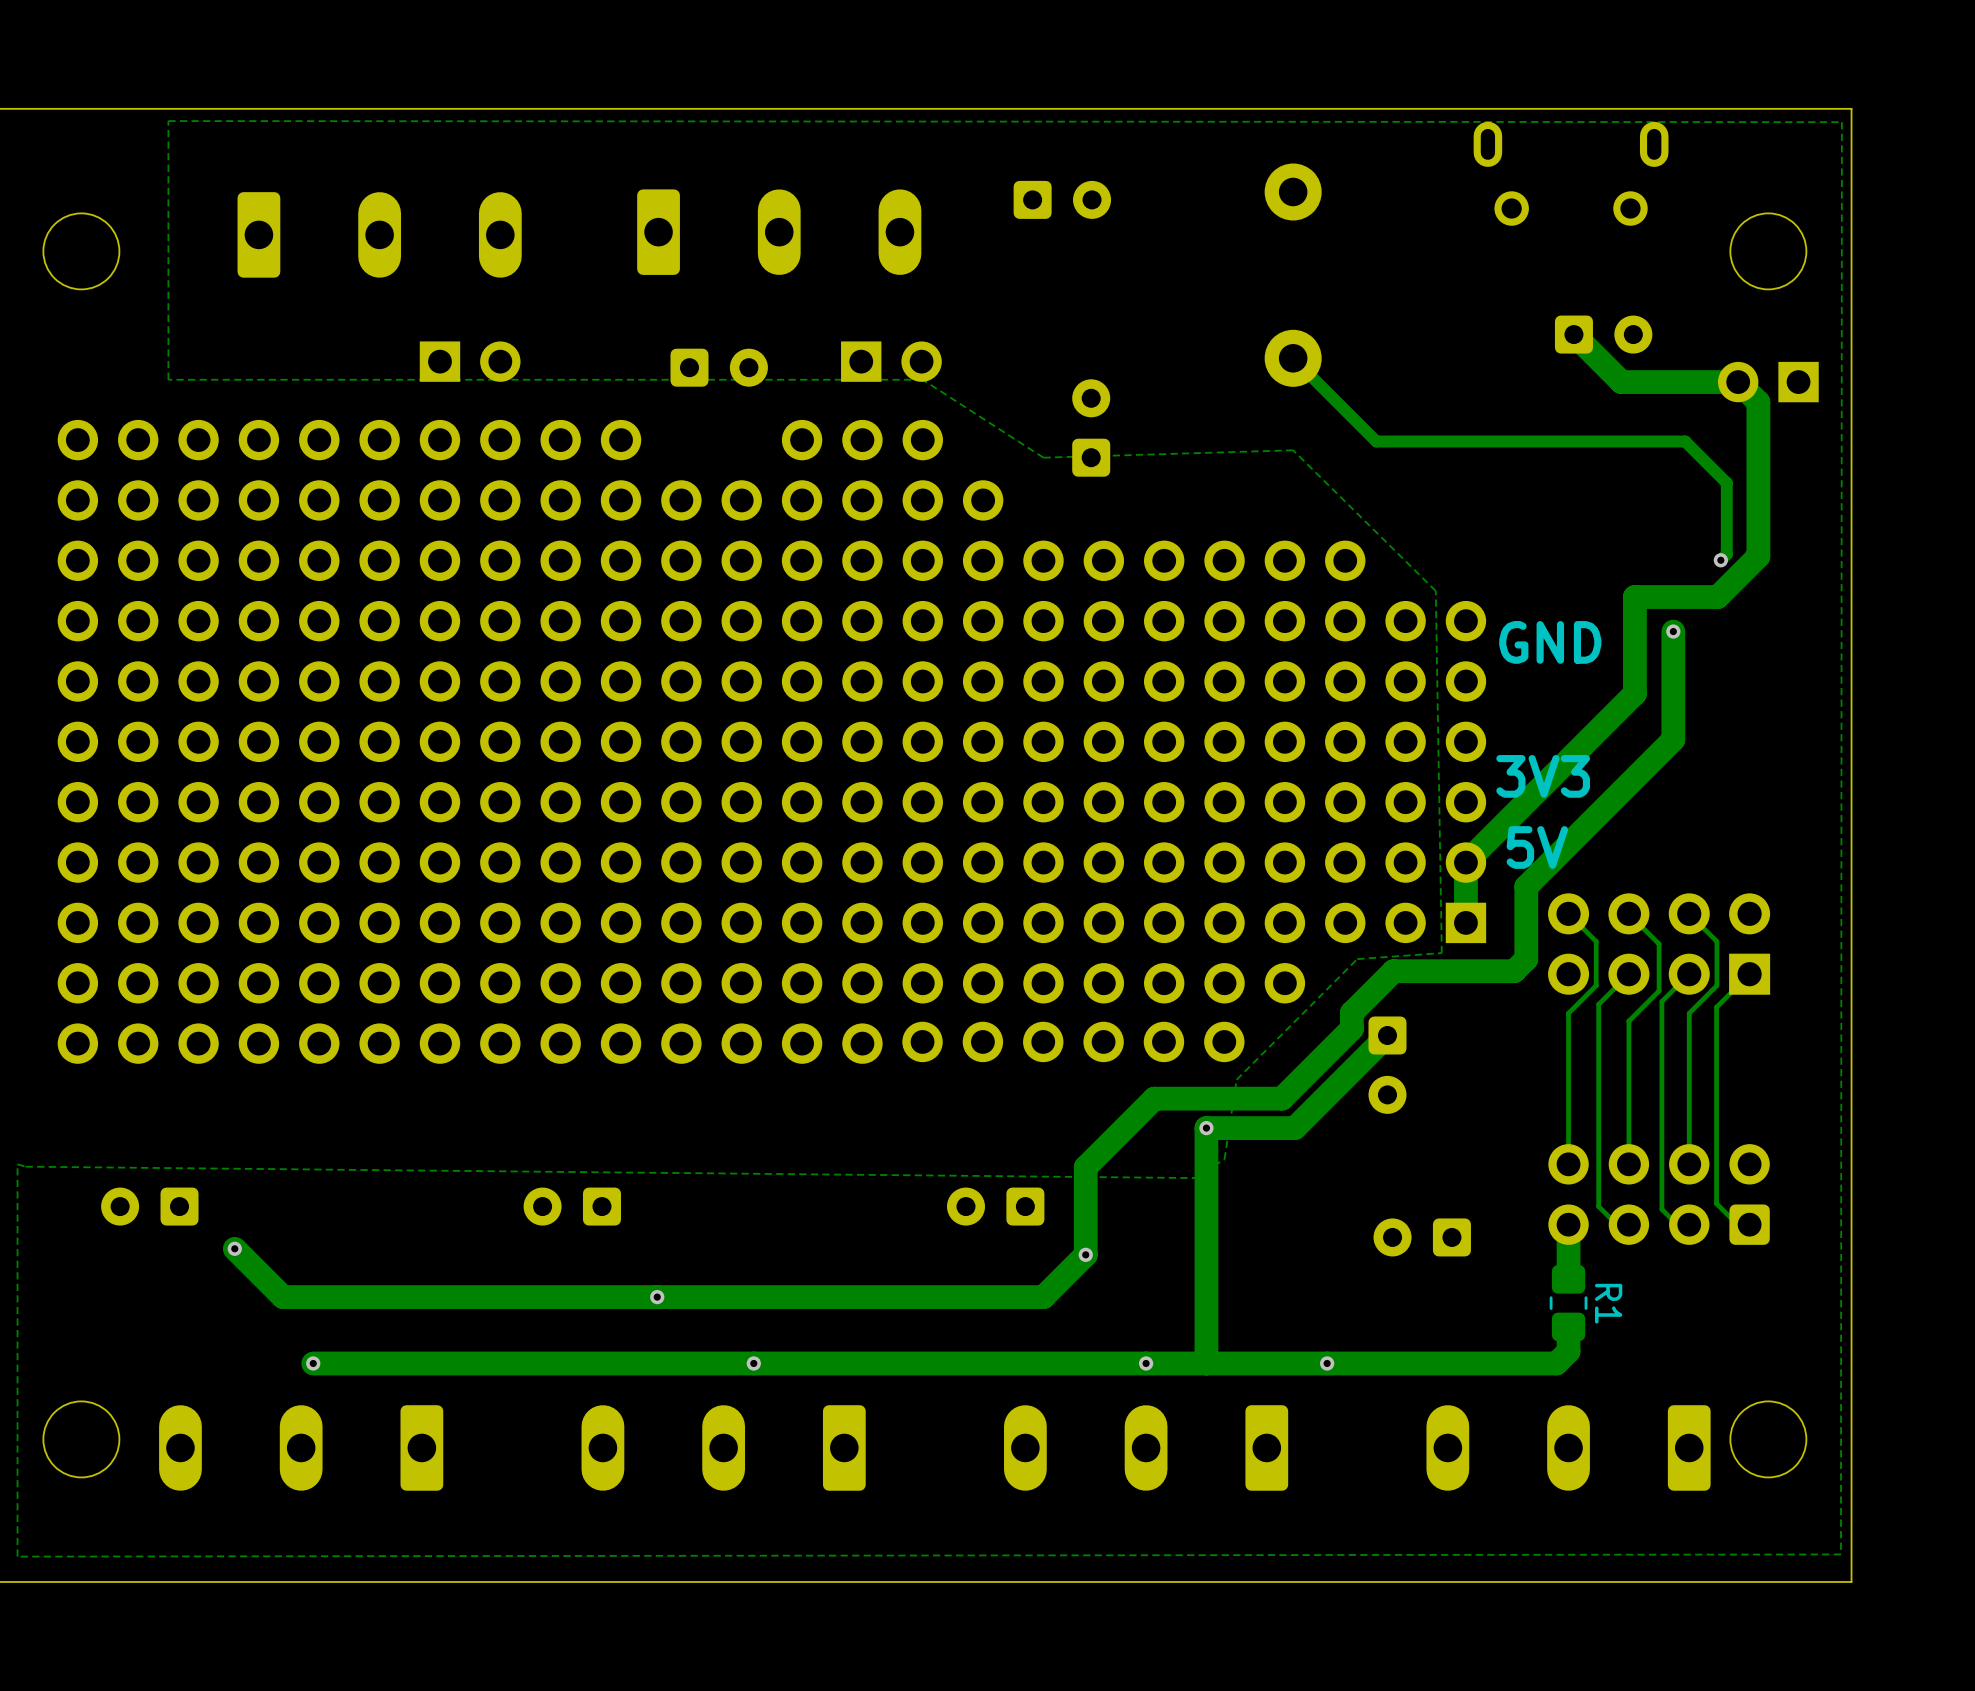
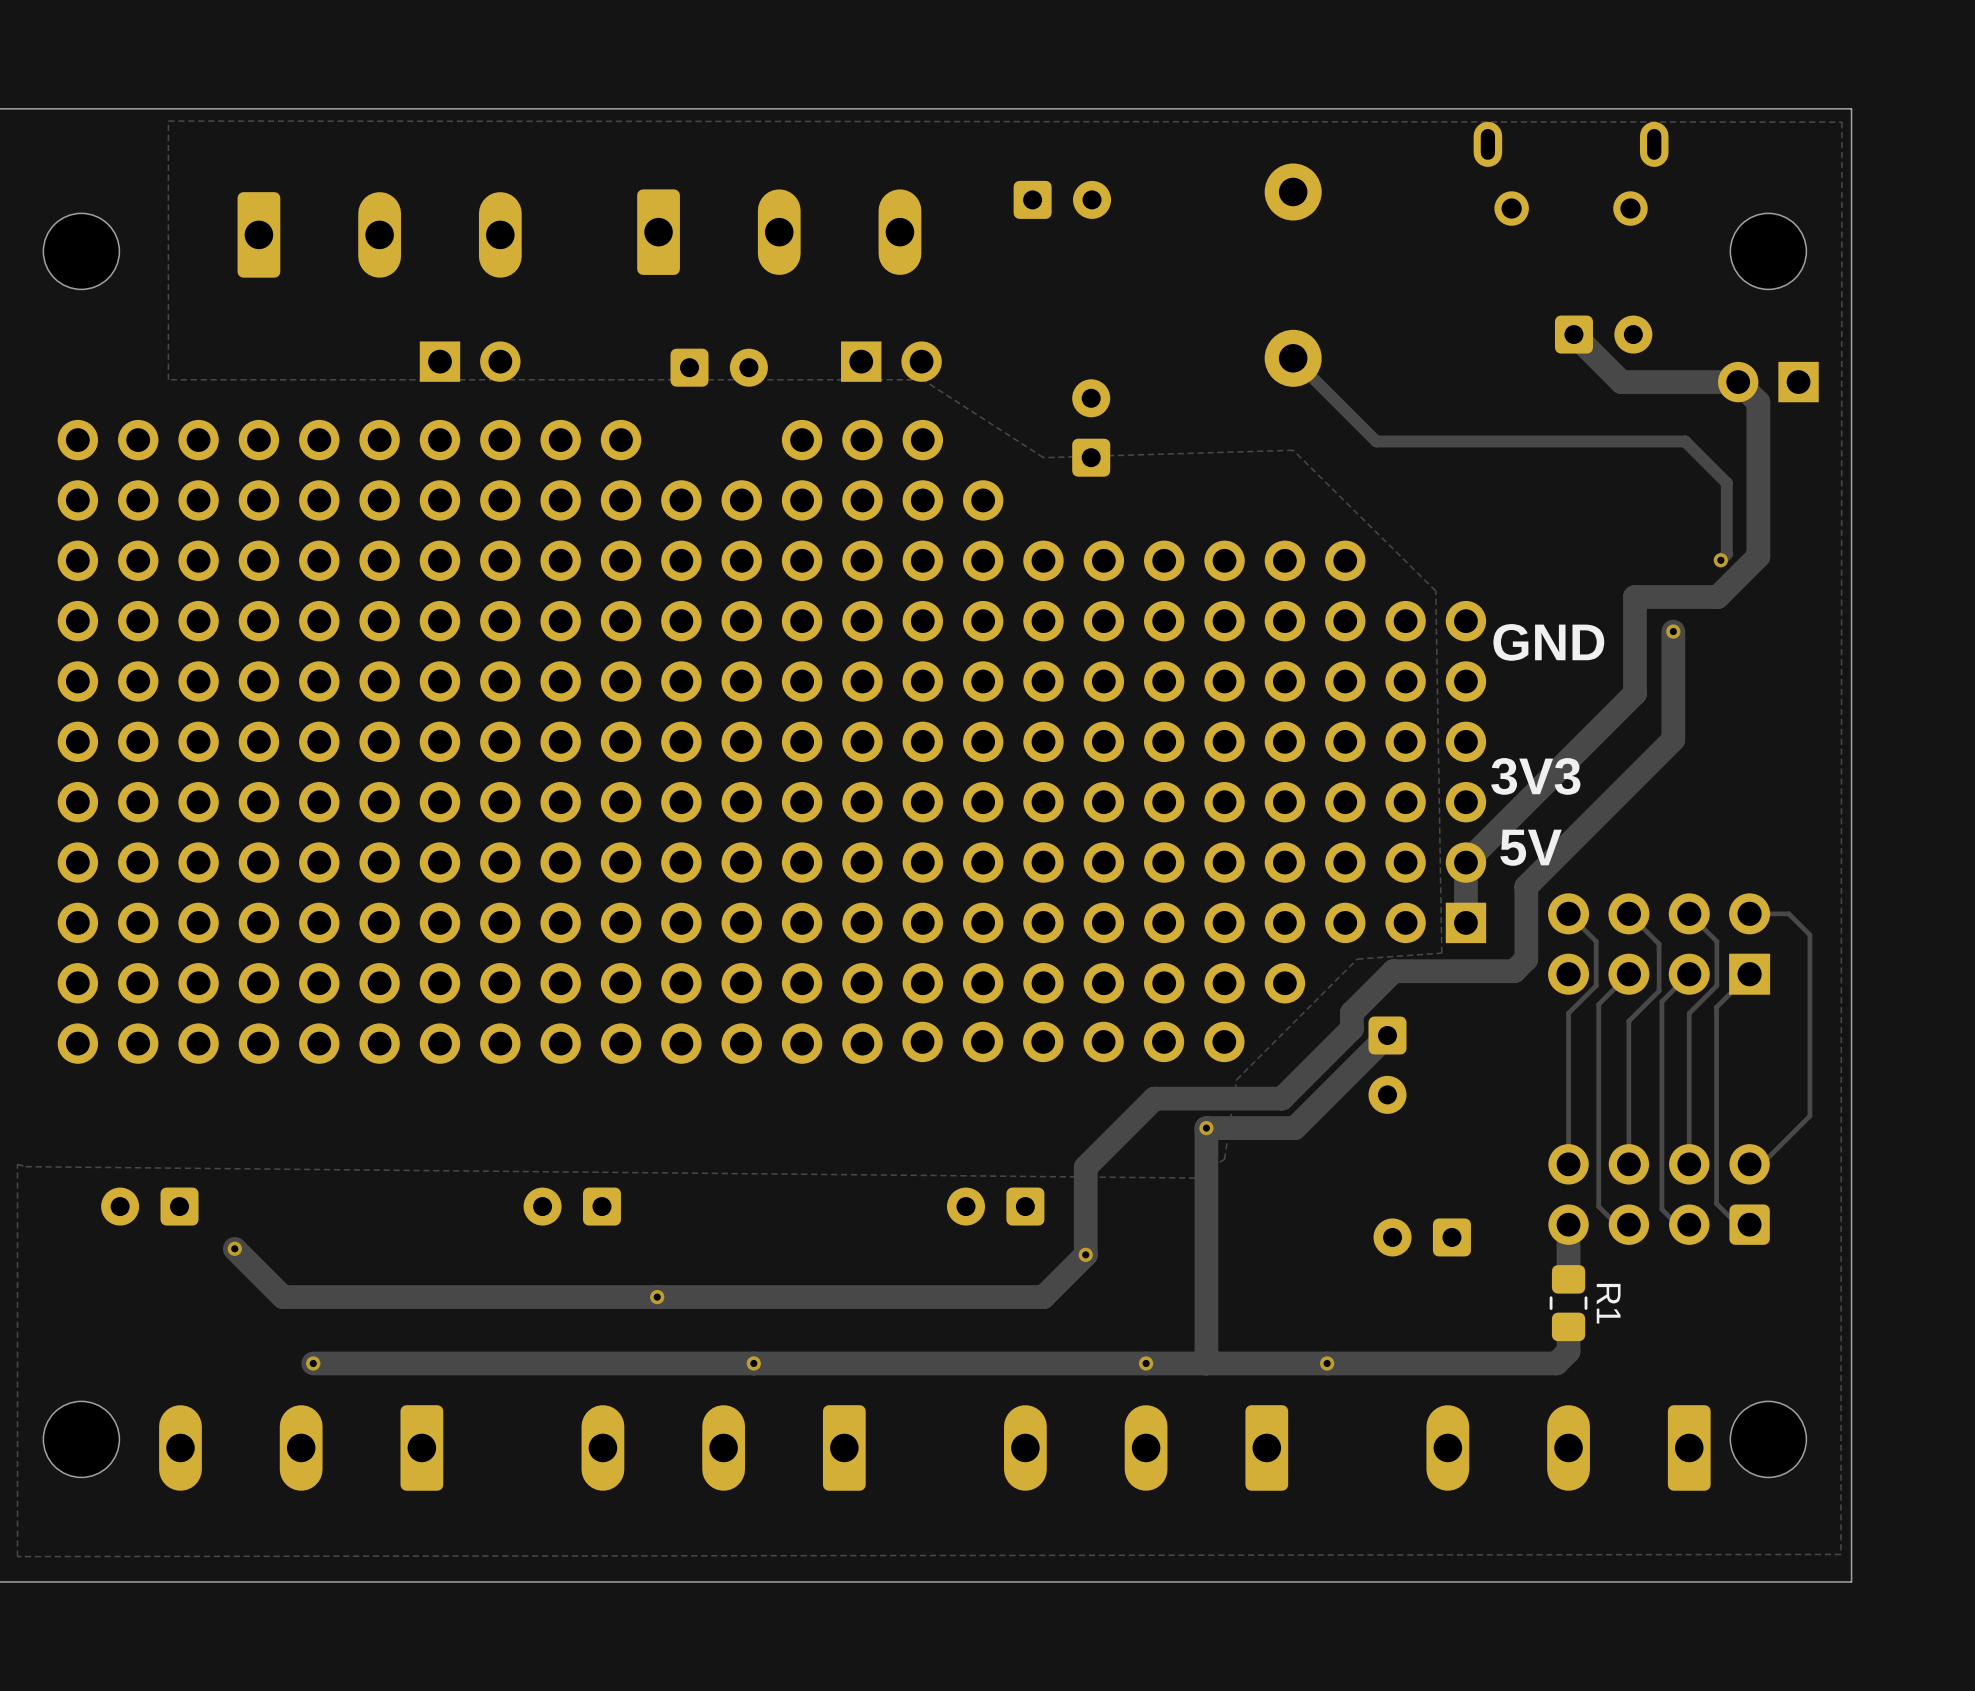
track: none -> (1749, 913) (1788, 913) (1809, 934) (1809, 1116) (1749, 1176)

